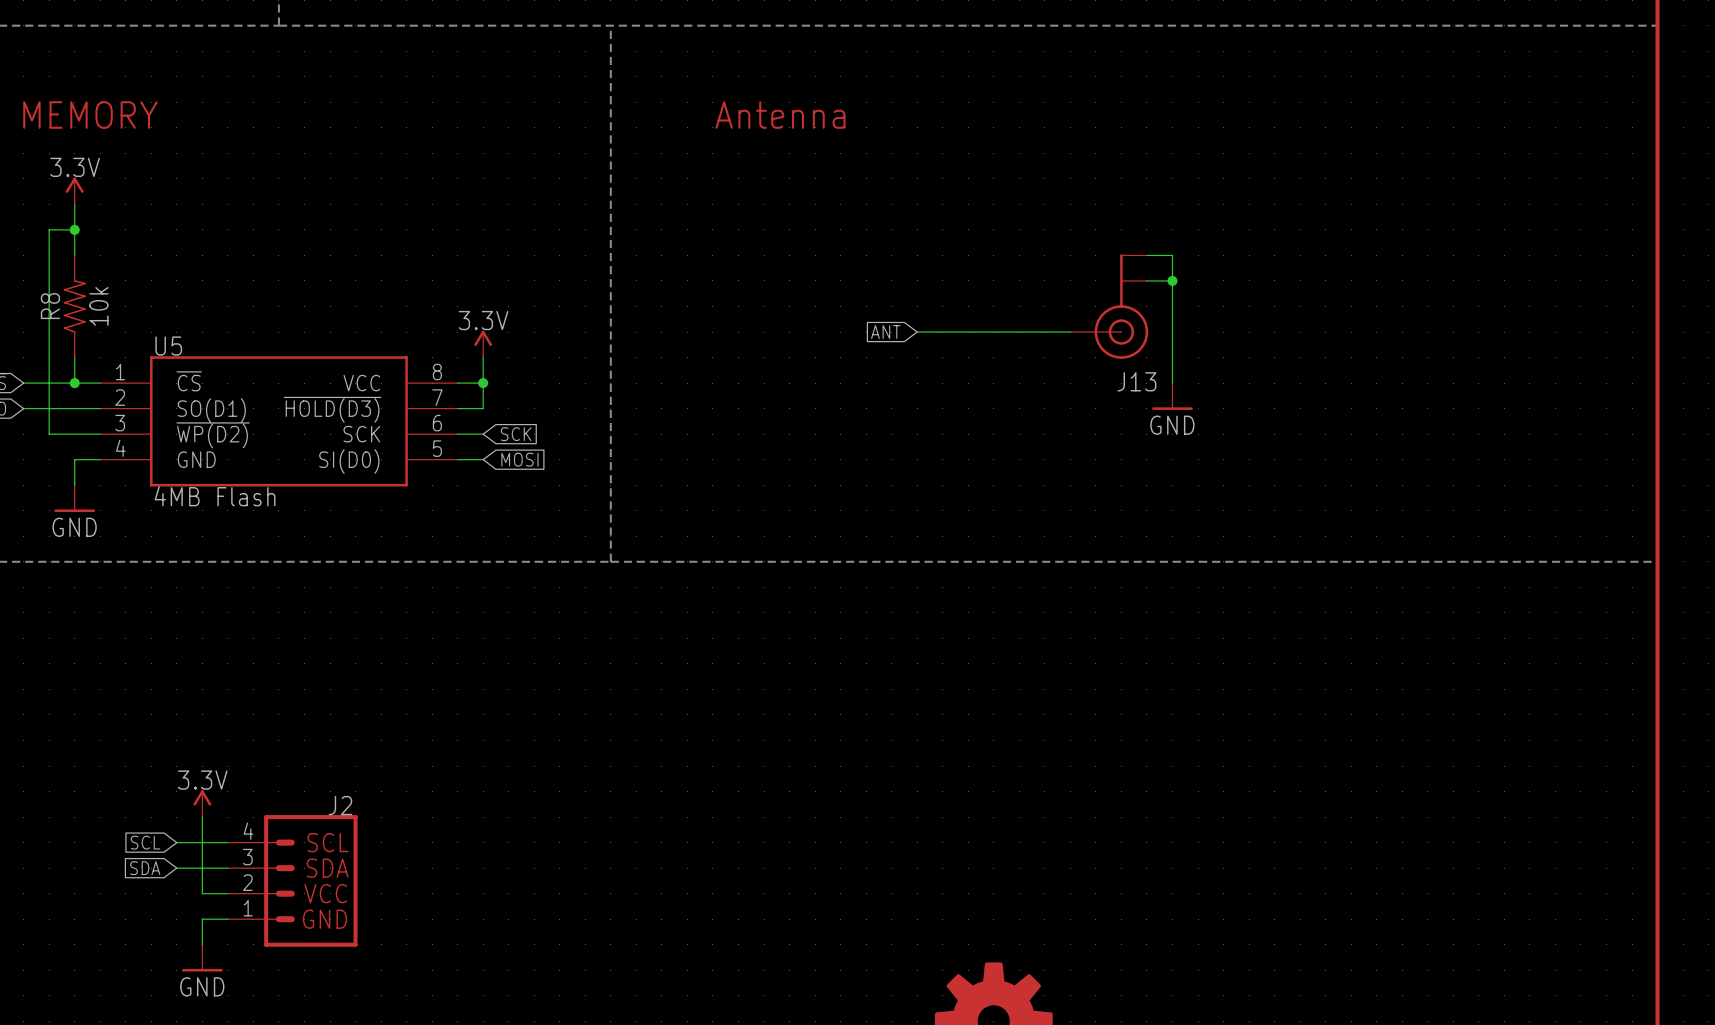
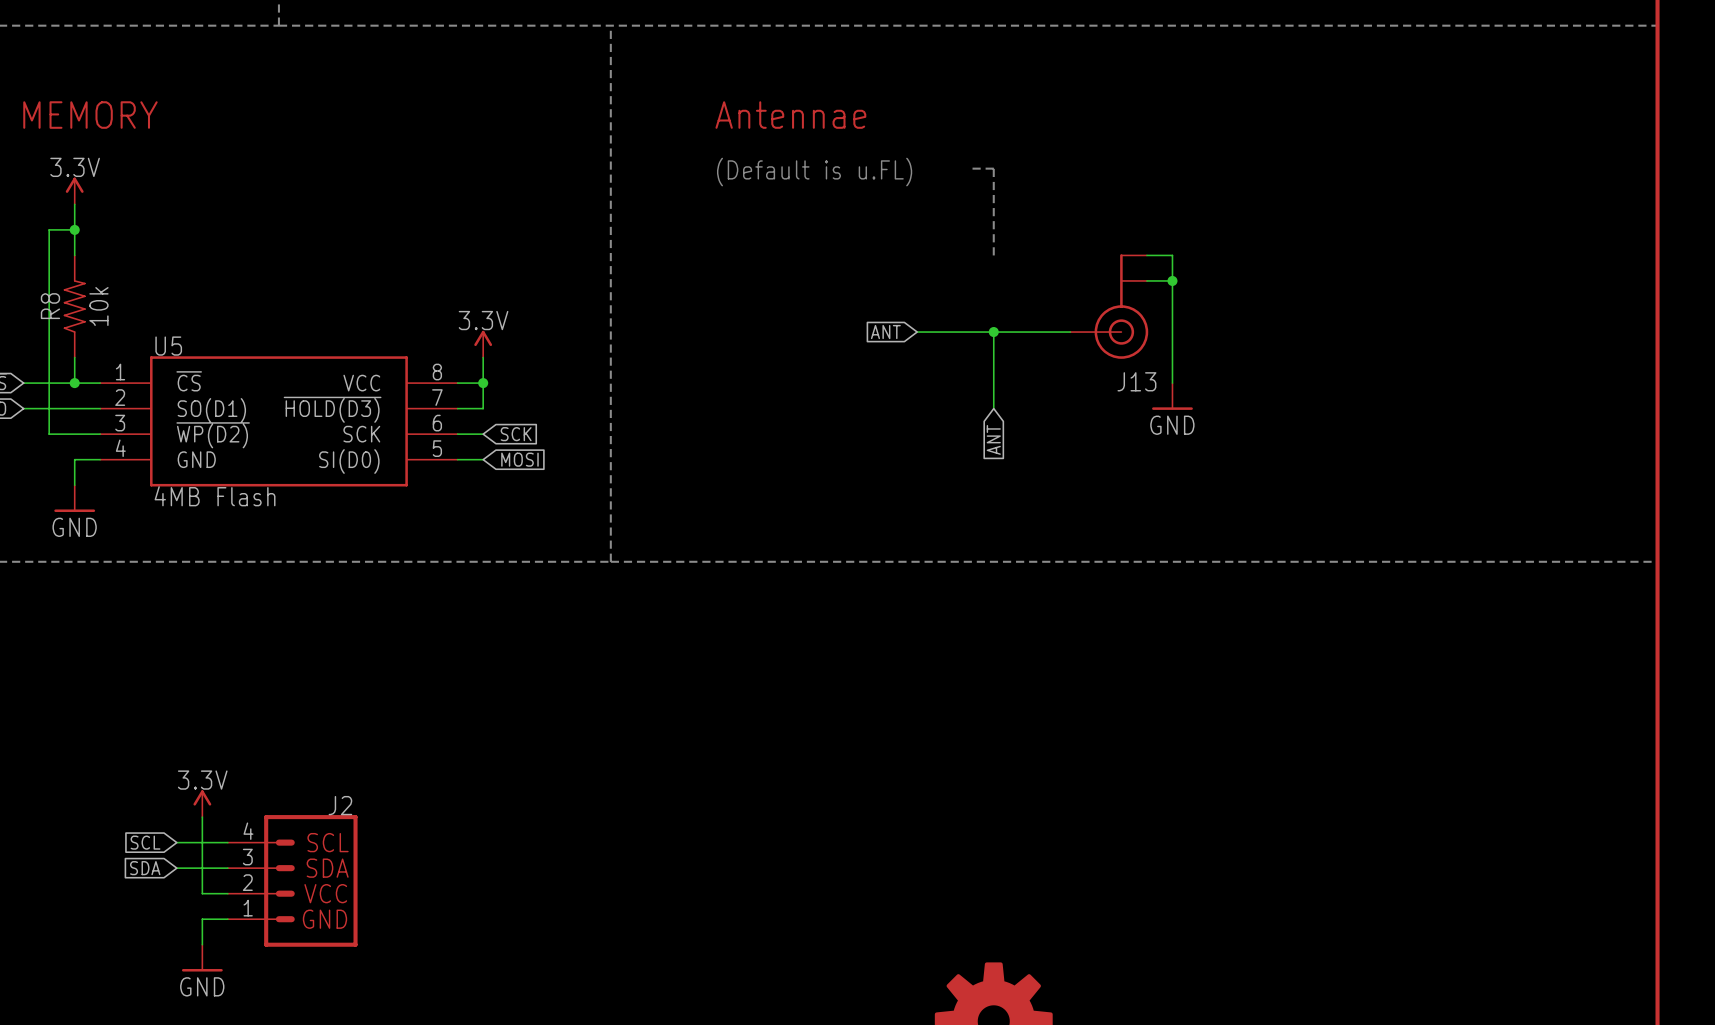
text: Antenna (780, 115) -> Antennae (790, 115)
line: none -> (968, 168) (993, 168) (993, 255)
text: none -> (Default is u.FL) (814, 172)
wire: none -> (993, 332) (993, 408)
junction: none -> (993, 332)
global label: none -> ANT (993, 439)

